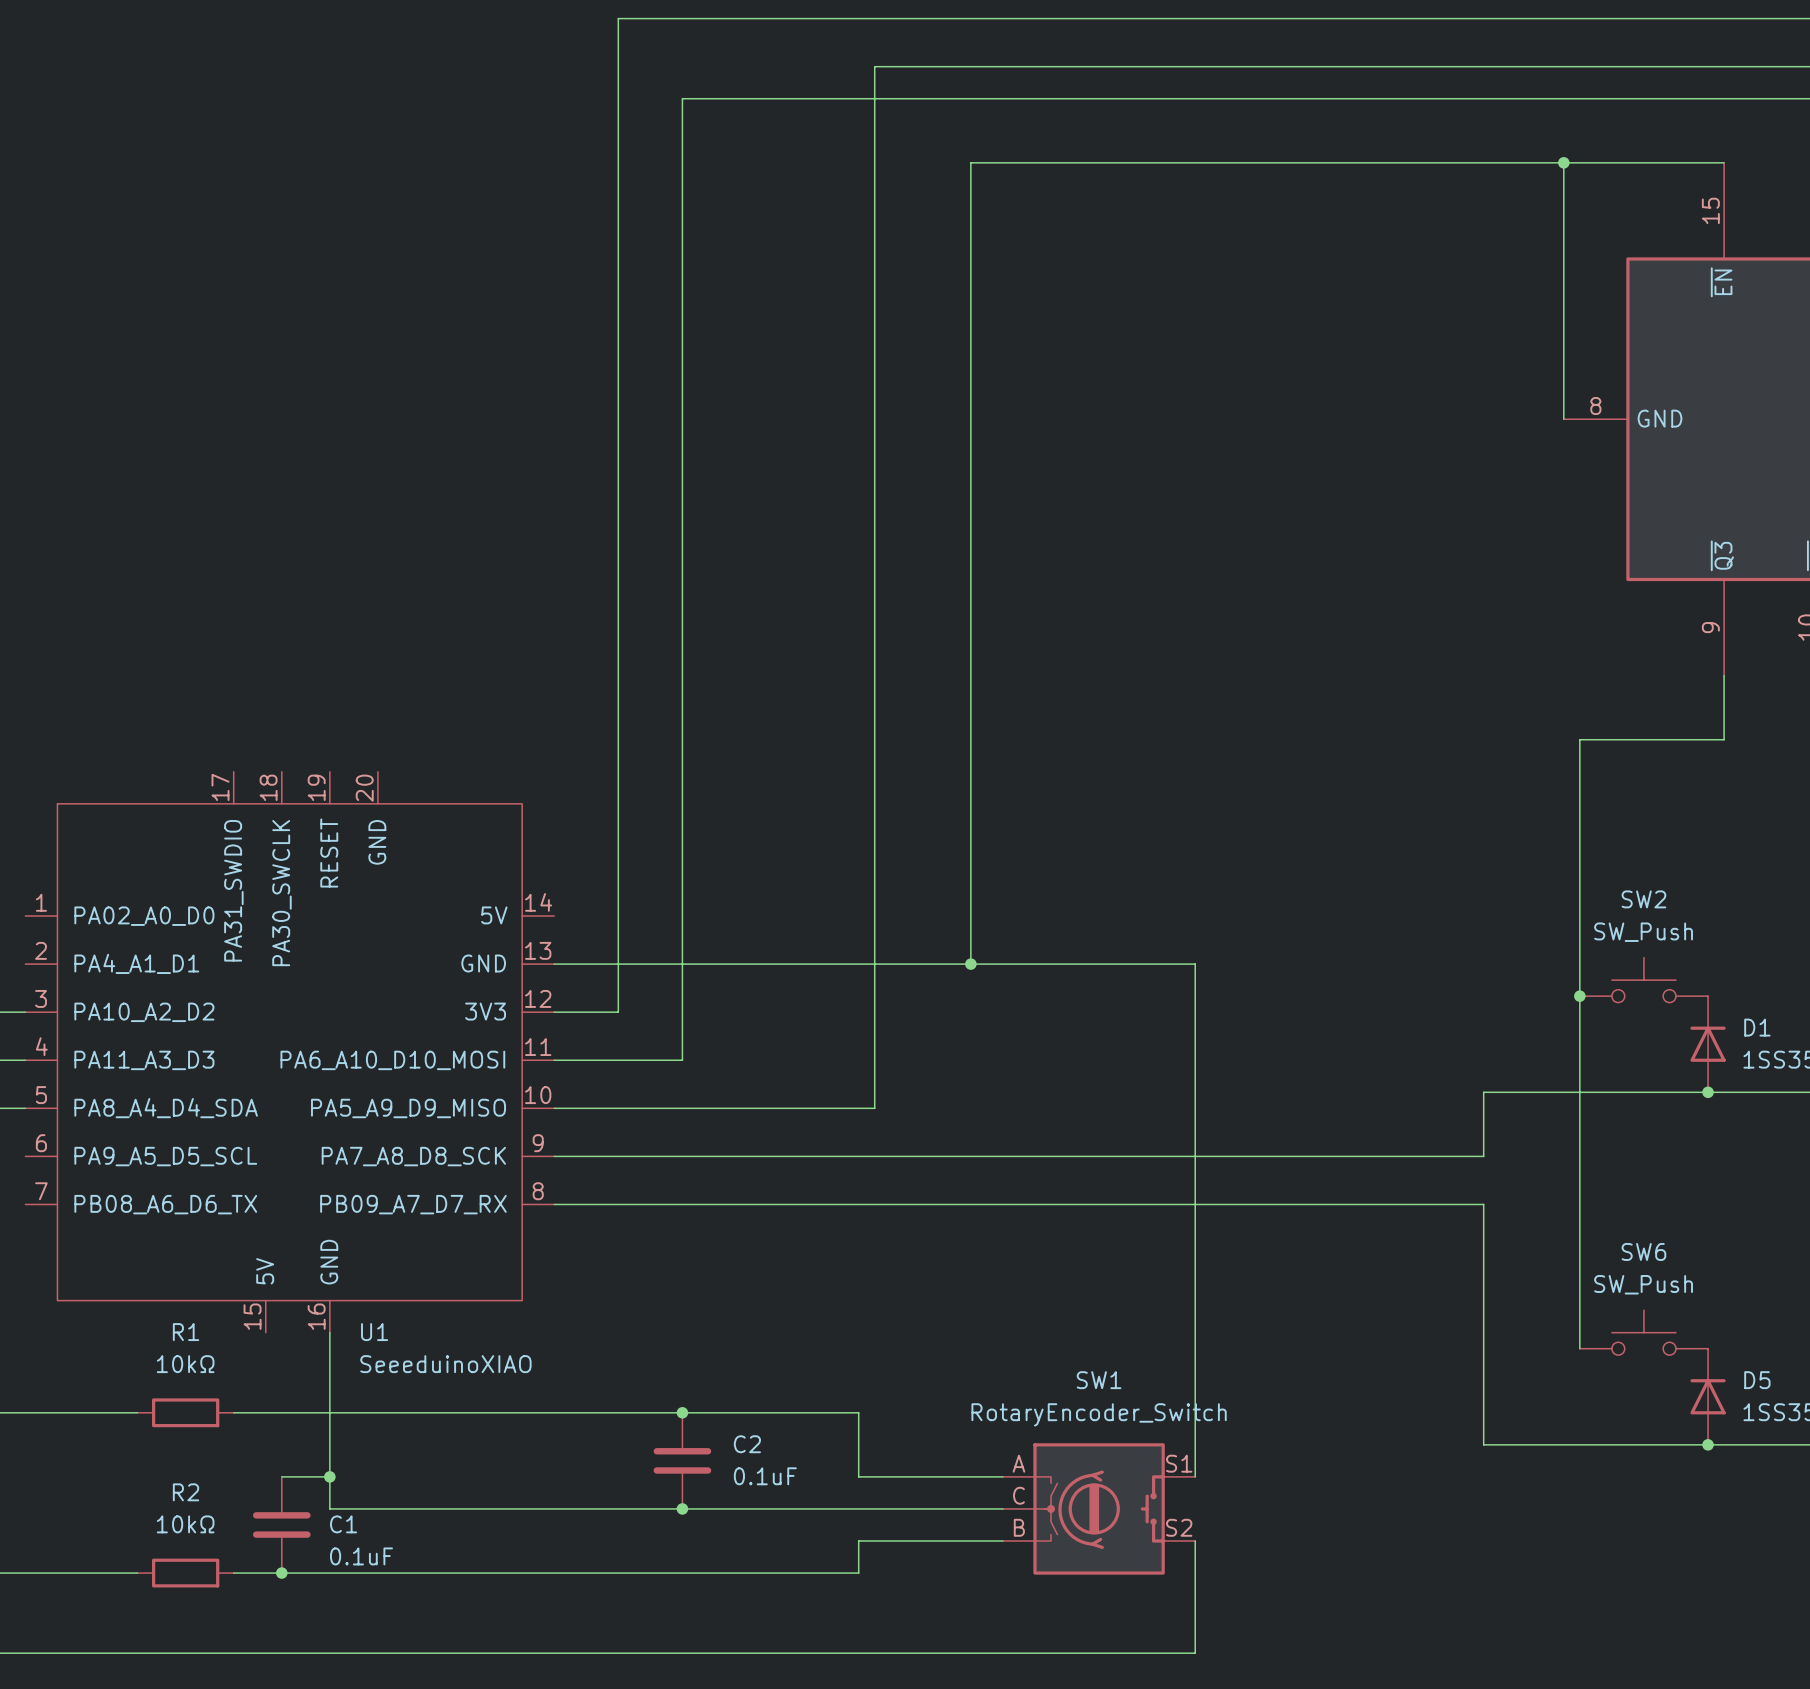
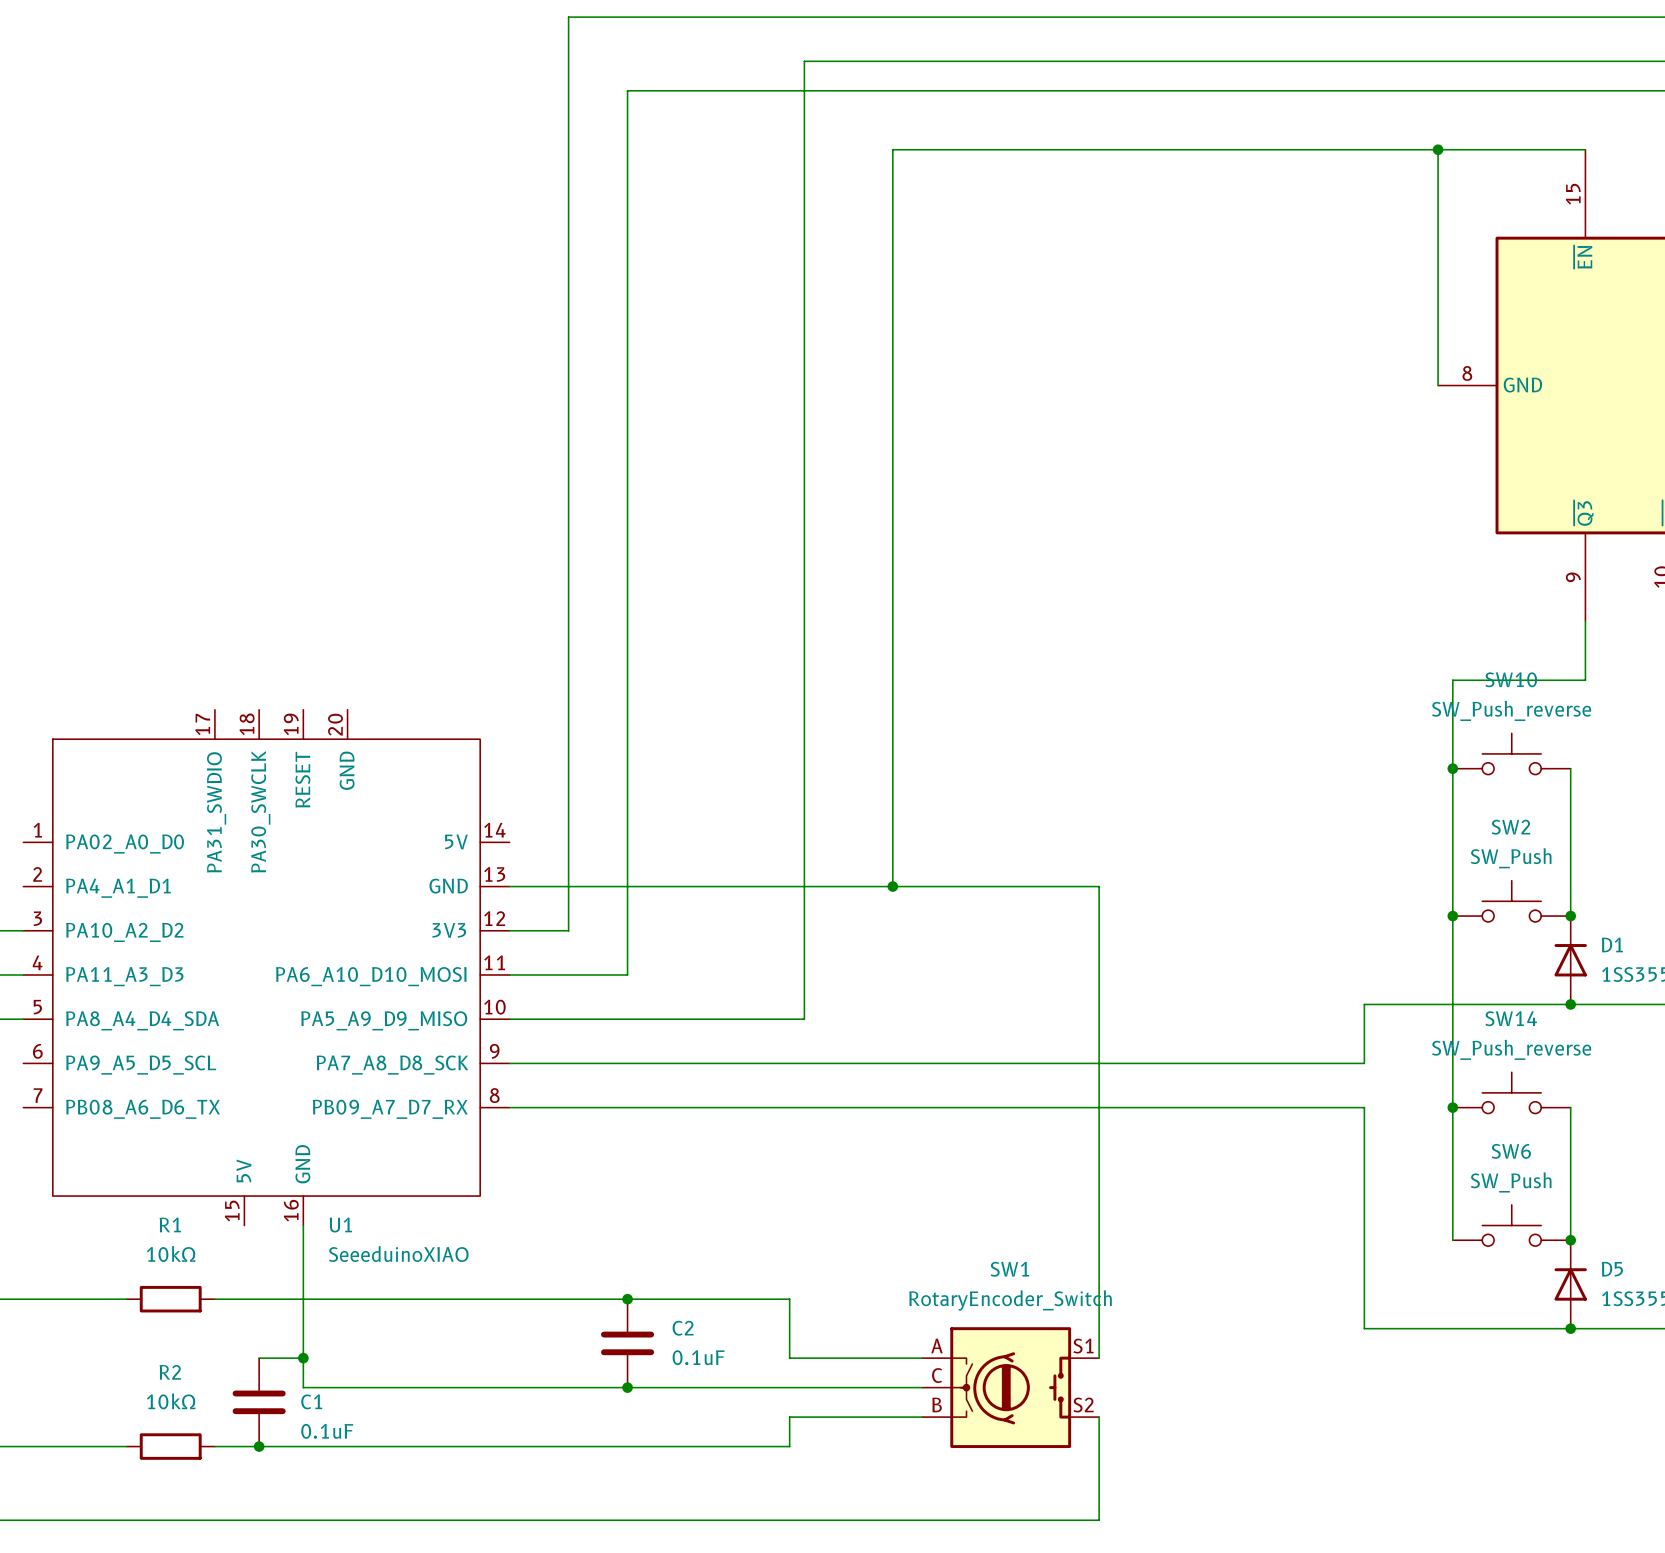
SW10: none -> SW_Push_reverse (1511, 753)
junction: none -> (1452, 768)
wire: none -> (1570, 768) (1570, 916)
junction: none -> (1570, 916)
SW14: none -> SW_Push_reverse (1511, 1092)
junction: none -> (1452, 1107)
wire: none -> (1570, 1107) (1570, 1240)
junction: none -> (1570, 1240)

